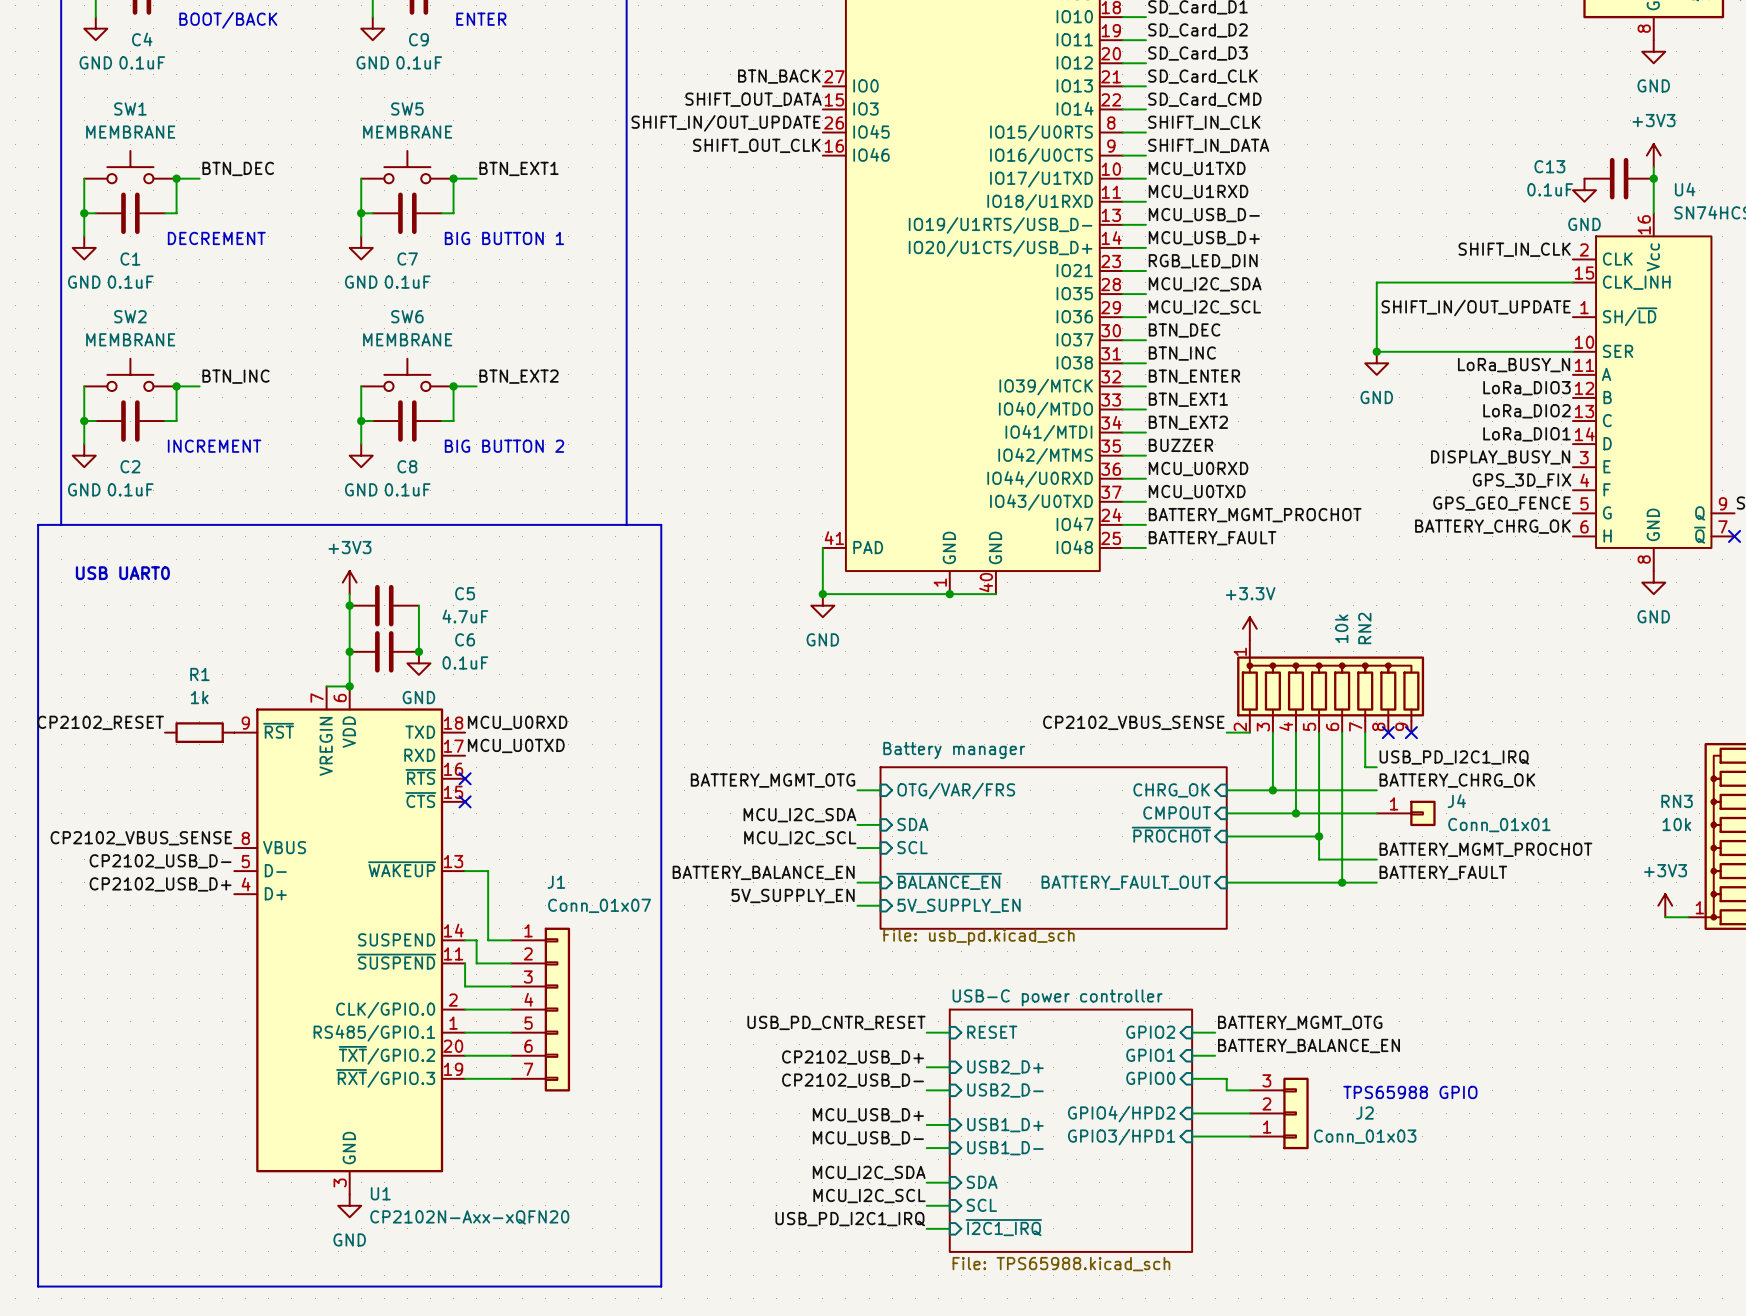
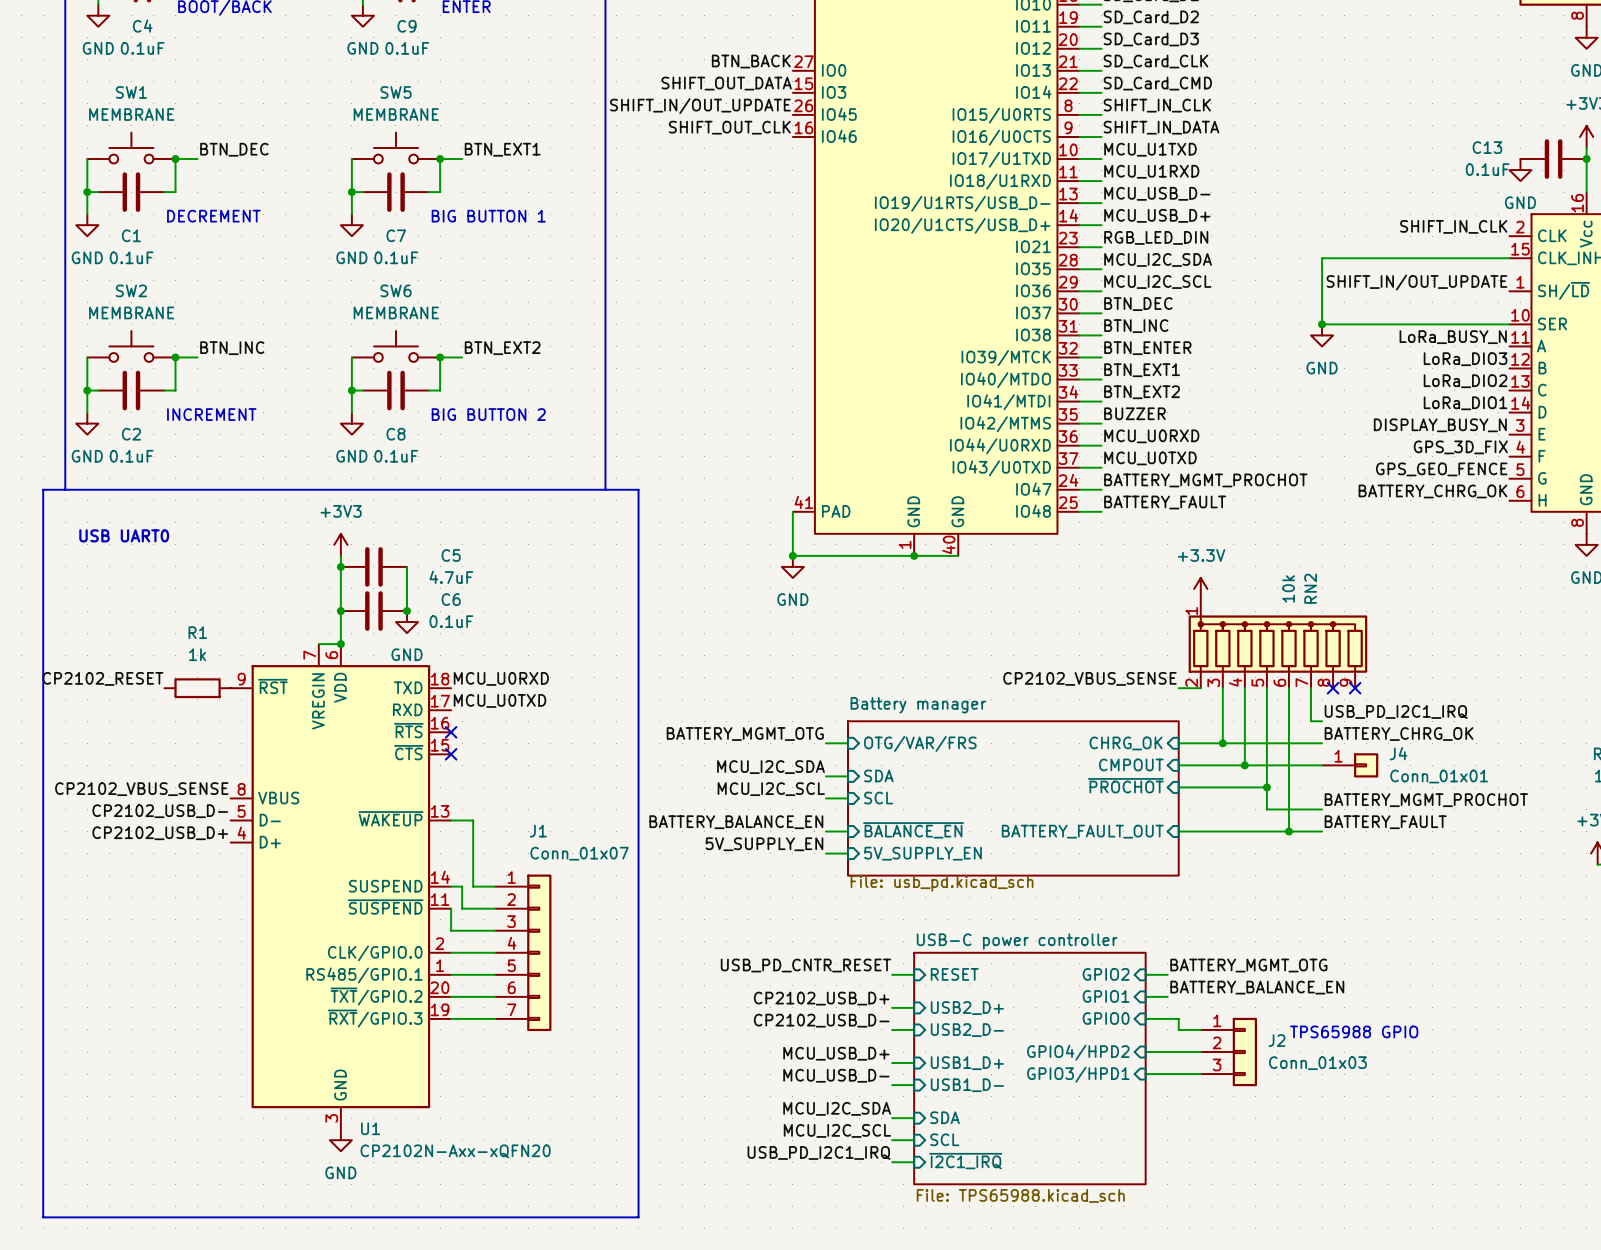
J2 flip: as is (1295, 1113) -> up-down (1244, 1052)
J2 name position: J2 (1364, 1113) -> J2 (1276, 1040)

